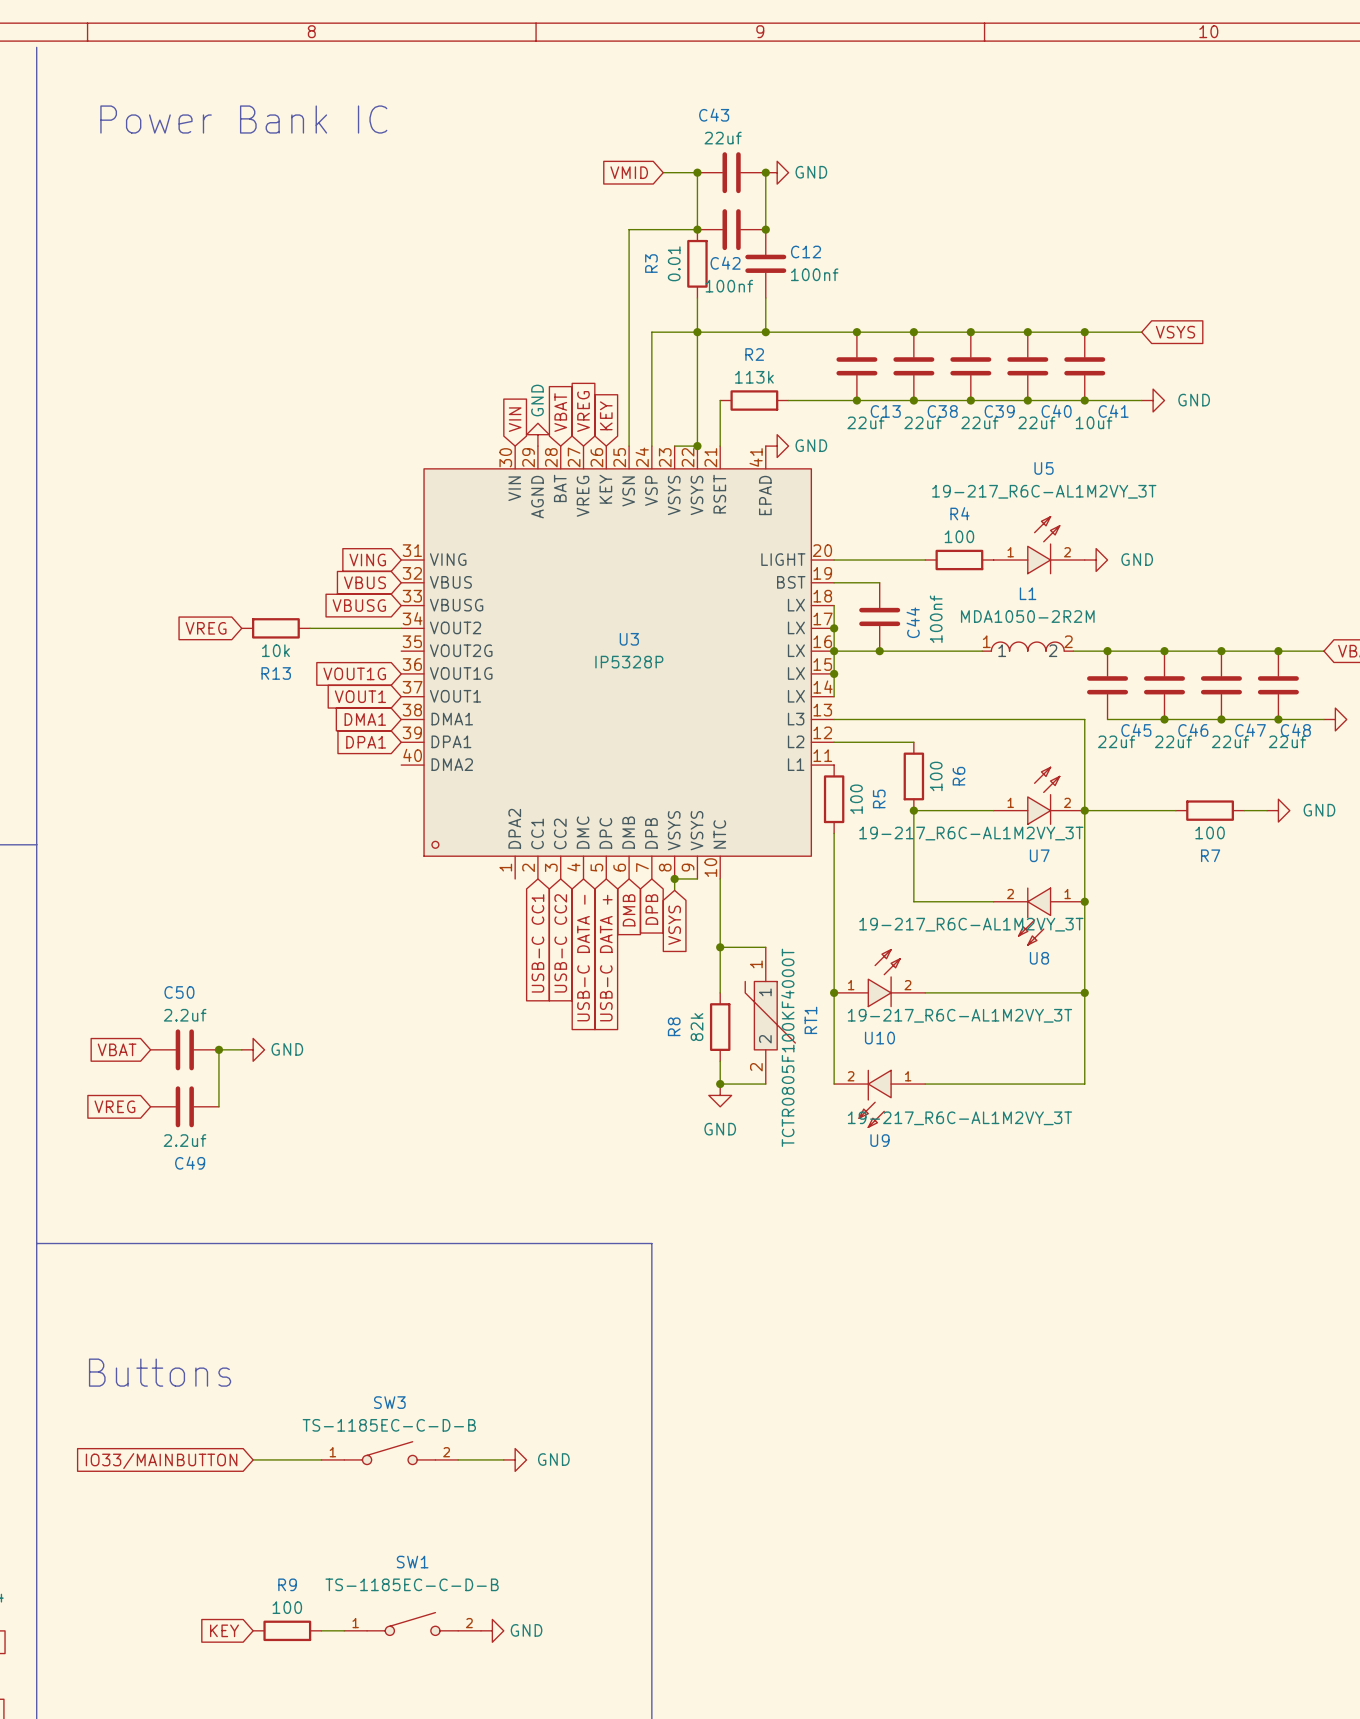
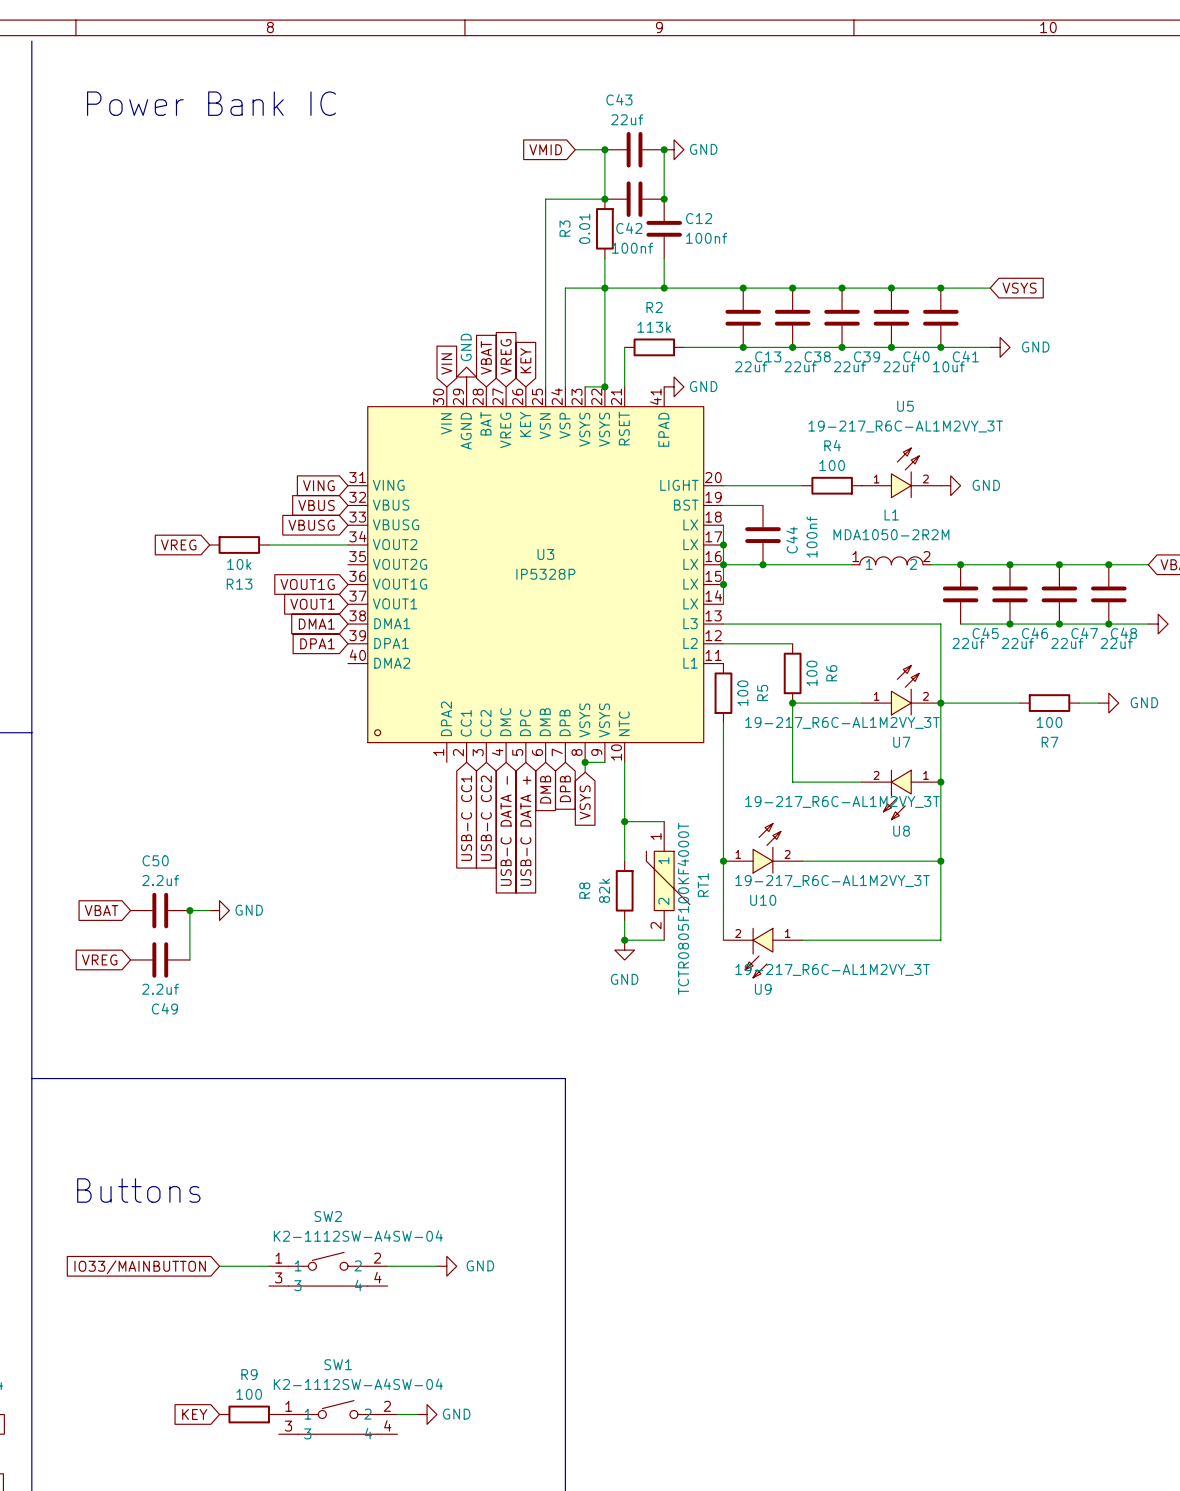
SW3: TS-1185EC-C-D-B (389, 1453) -> none
SW2: none -> K2-1112SW-A4SW-04 (328, 1269)
SW1 value: TS-1185EC-C-D-B (412, 1584) -> K2-1112SW-A4SW-04 (358, 1384)
SW1 symbol: [344, 1612, 481, 1636] -> [278, 1400, 398, 1435]

